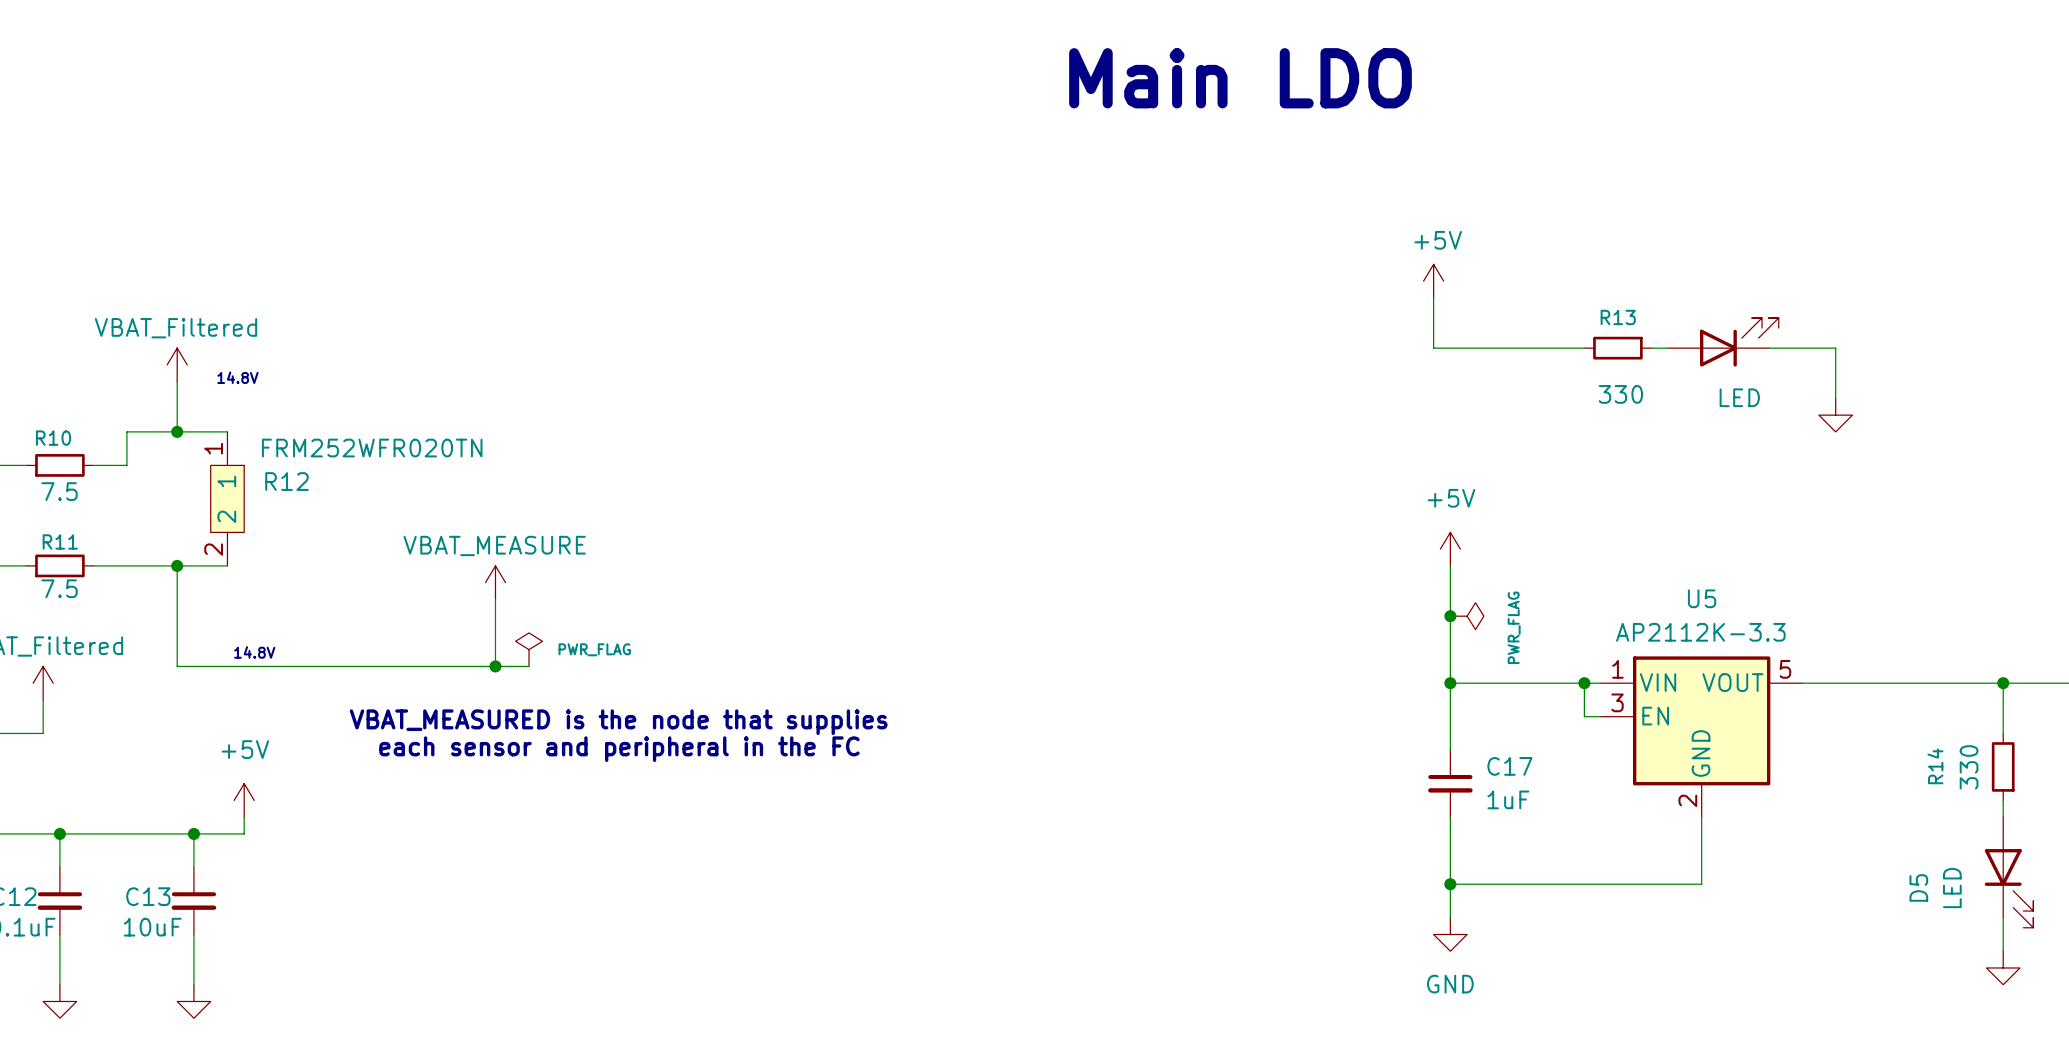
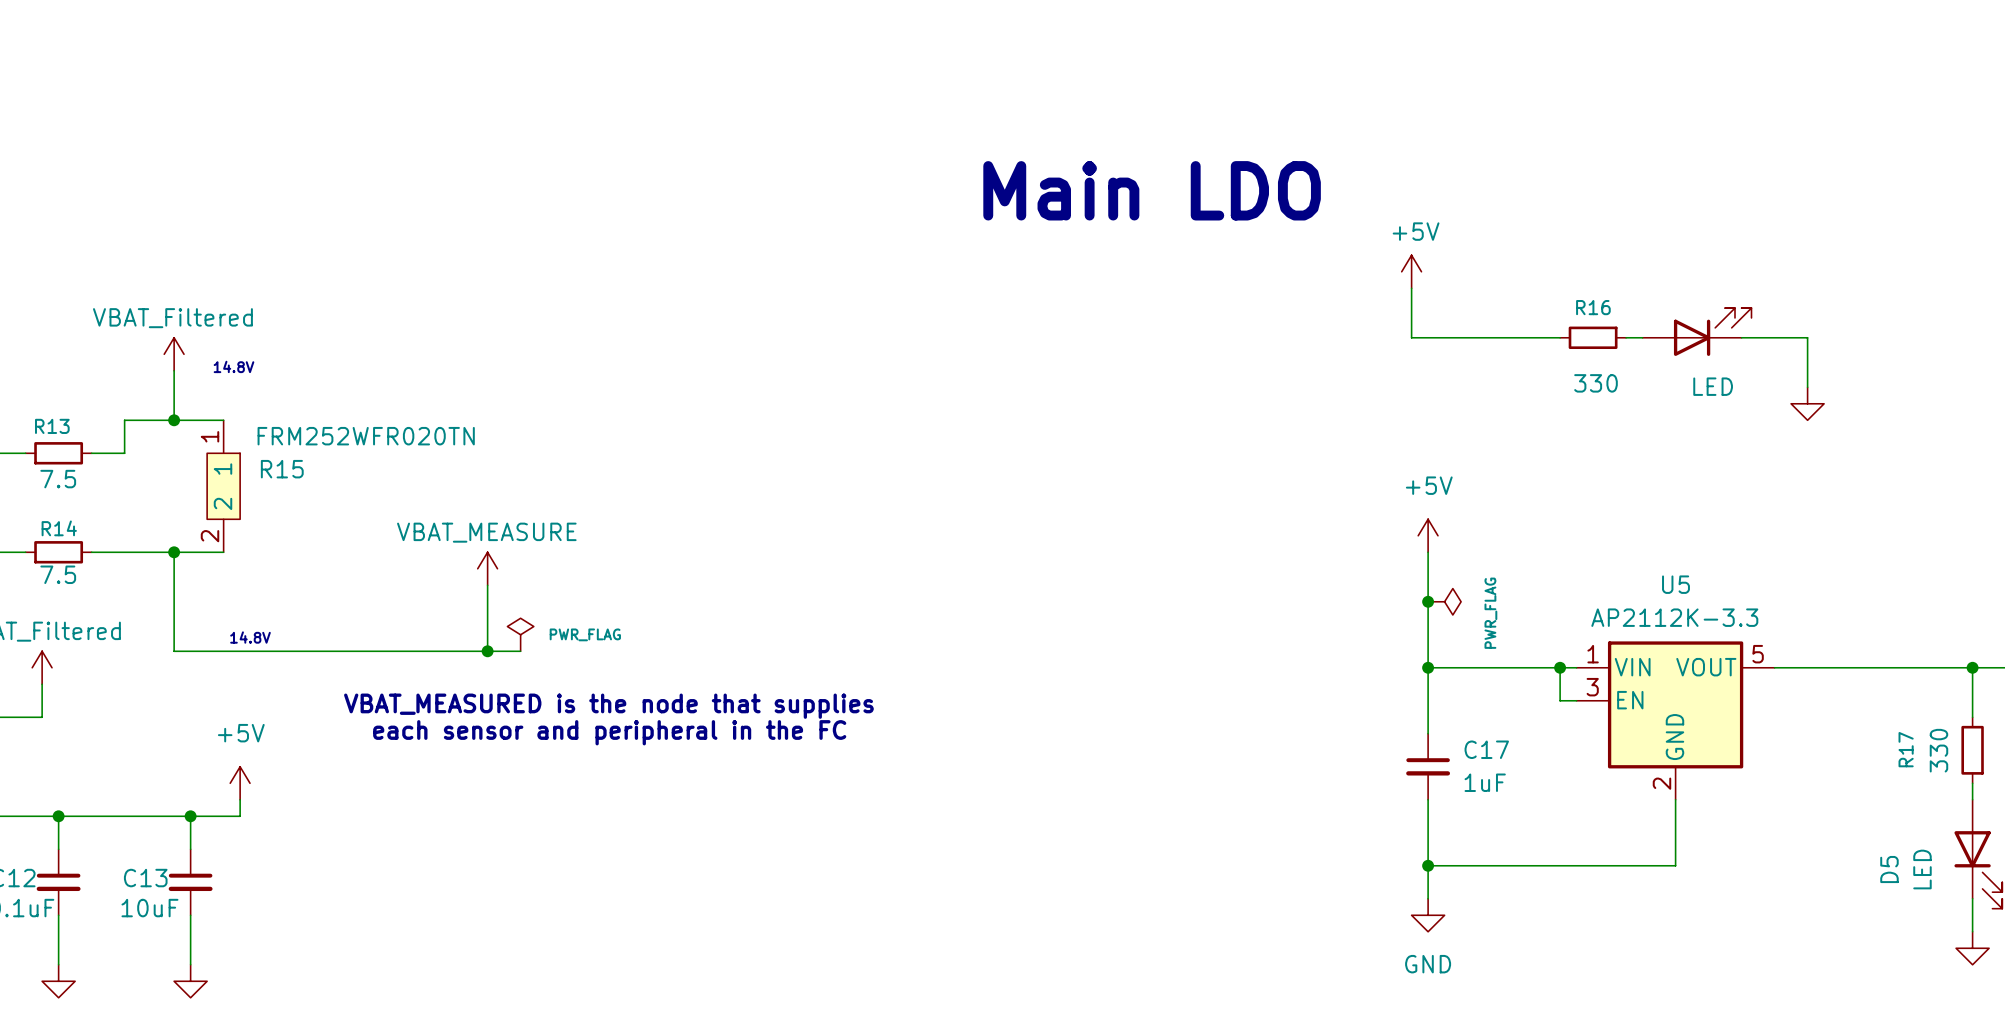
text position: Main LDO (1240, 78) -> Main LDO (1152, 190)
R13 name: R13 (1618, 317) -> R16 (1593, 307)
R10 name: R10 (53, 438) -> R13 (52, 426)
R12 name: R12 (287, 481) -> R15 (282, 469)
R11 name: R11 (60, 541) -> R14 (59, 528)
R14 name: R14 (1935, 766) -> R17 (1906, 749)

